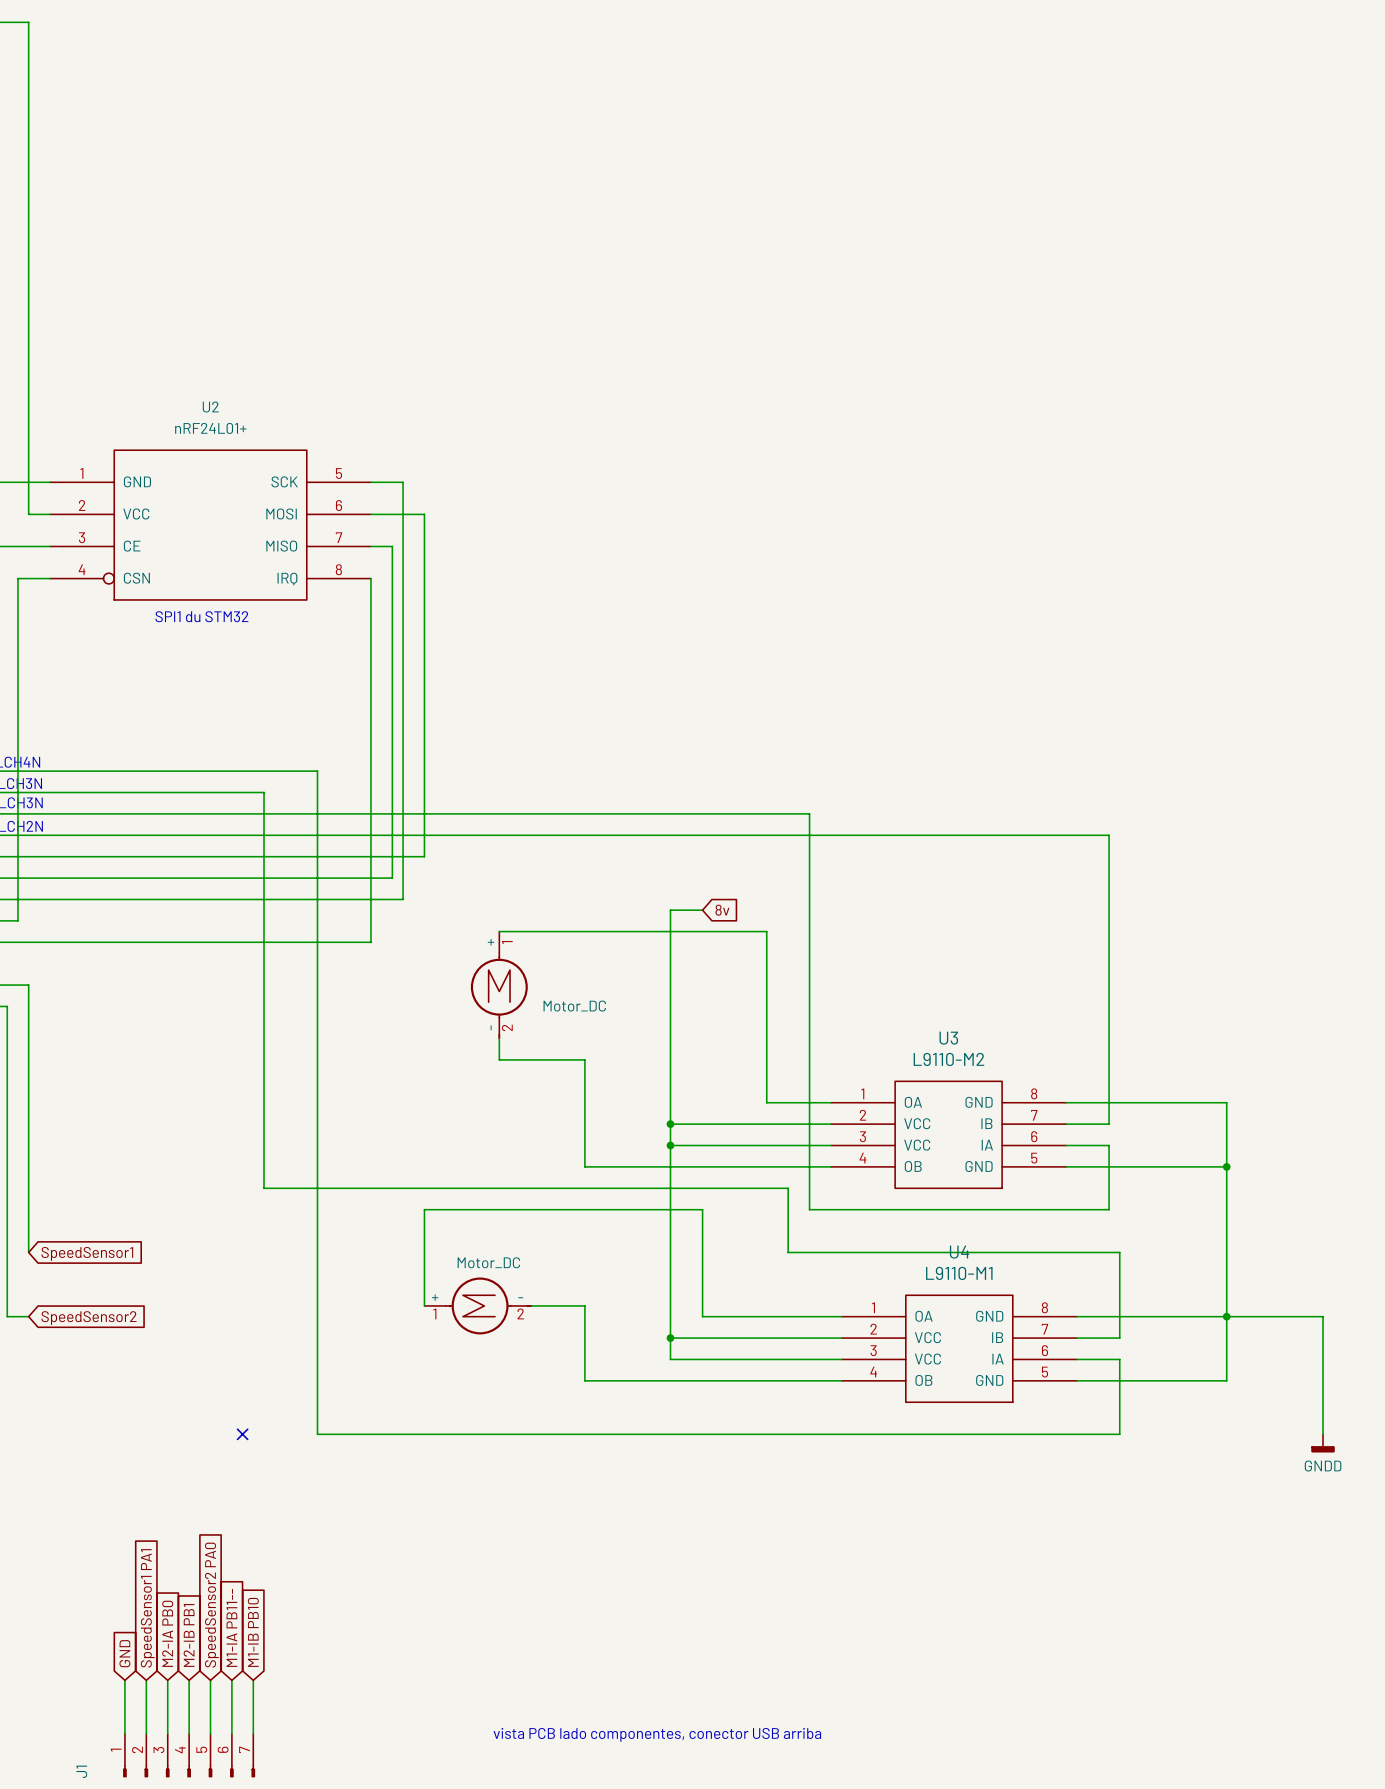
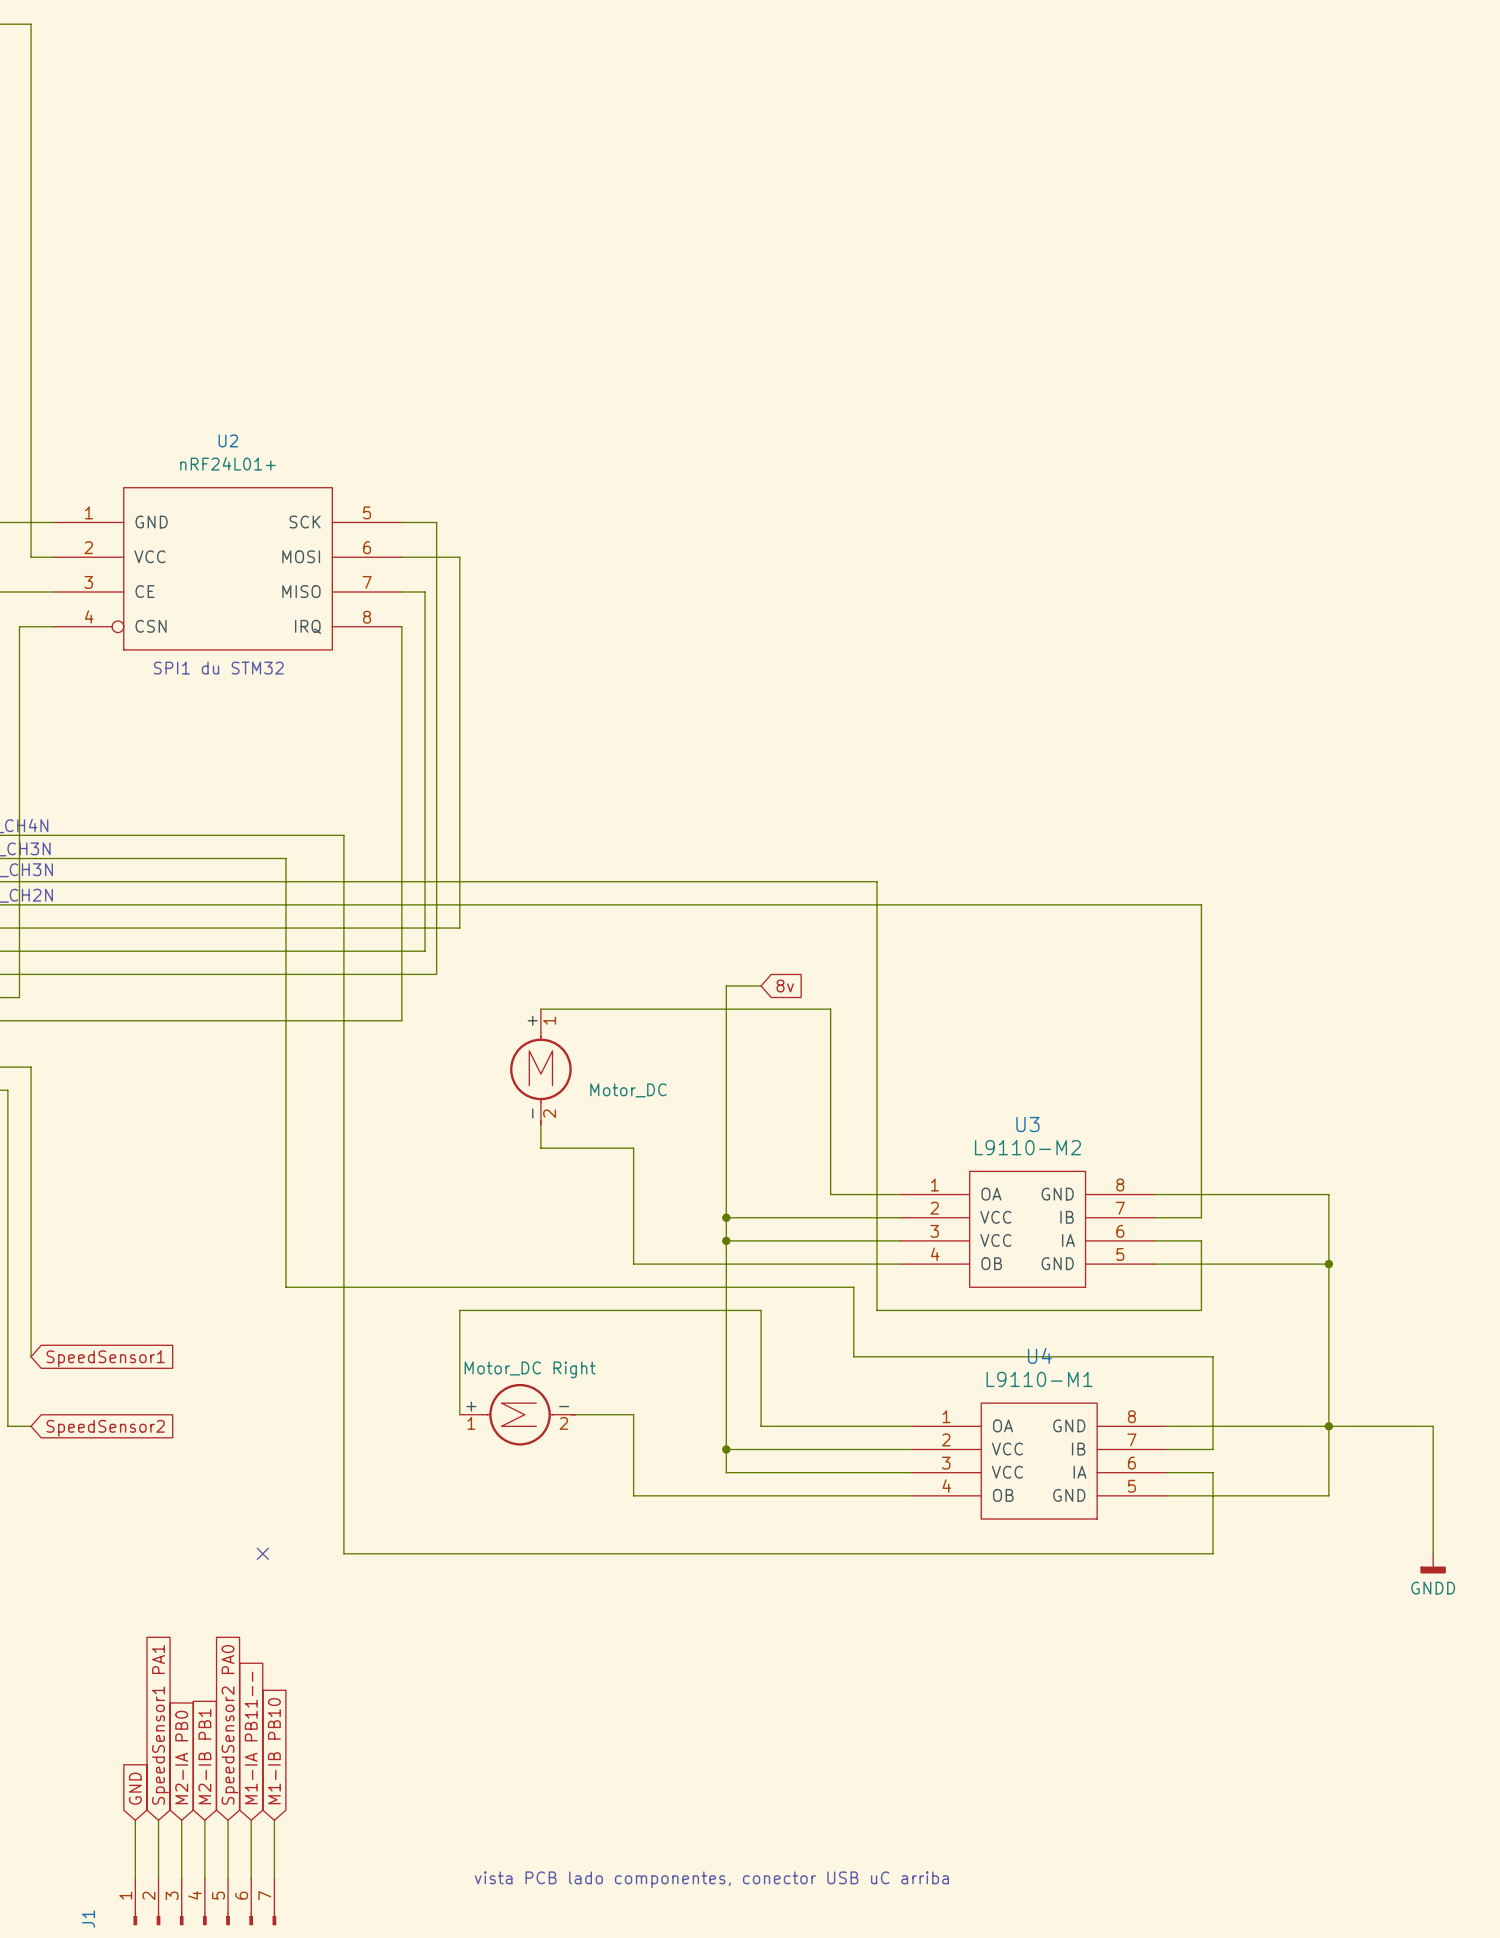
part value: Motor_DC (488, 1262) -> Motor_DC Right (530, 1369)
text: vista PCB lado componentes, conector USB arriba (657, 1734) -> vista PCB lado componentes, conector USB uC arriba (711, 1879)

